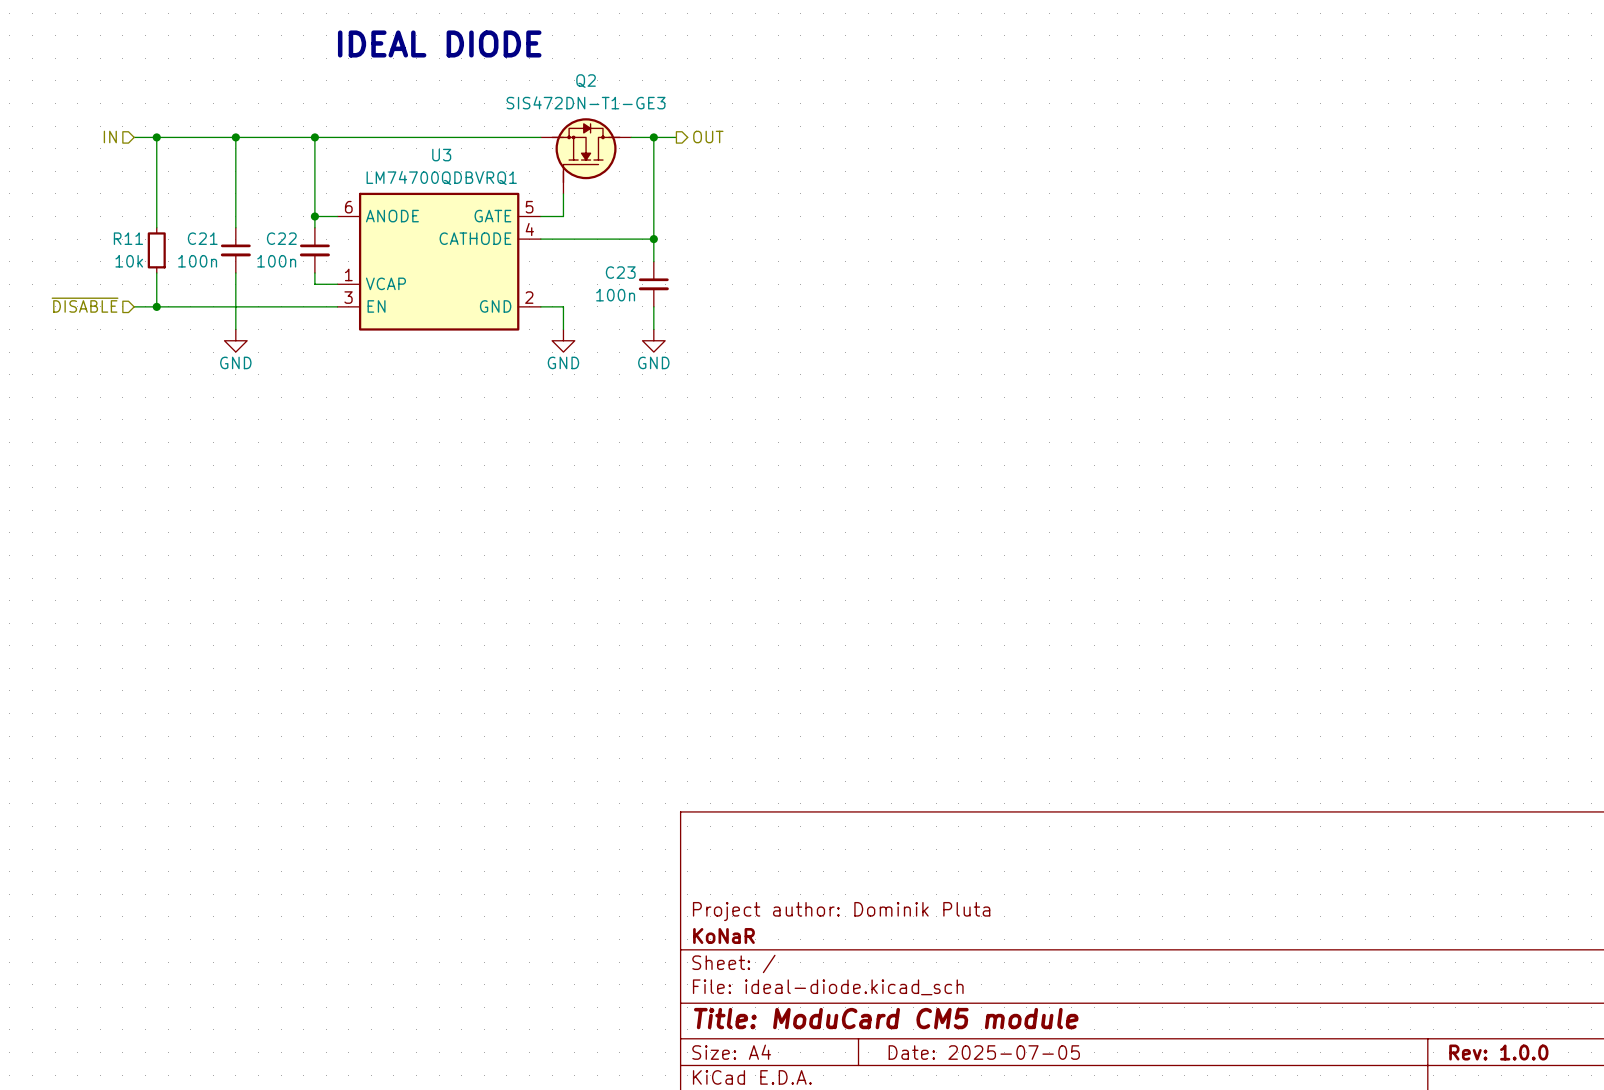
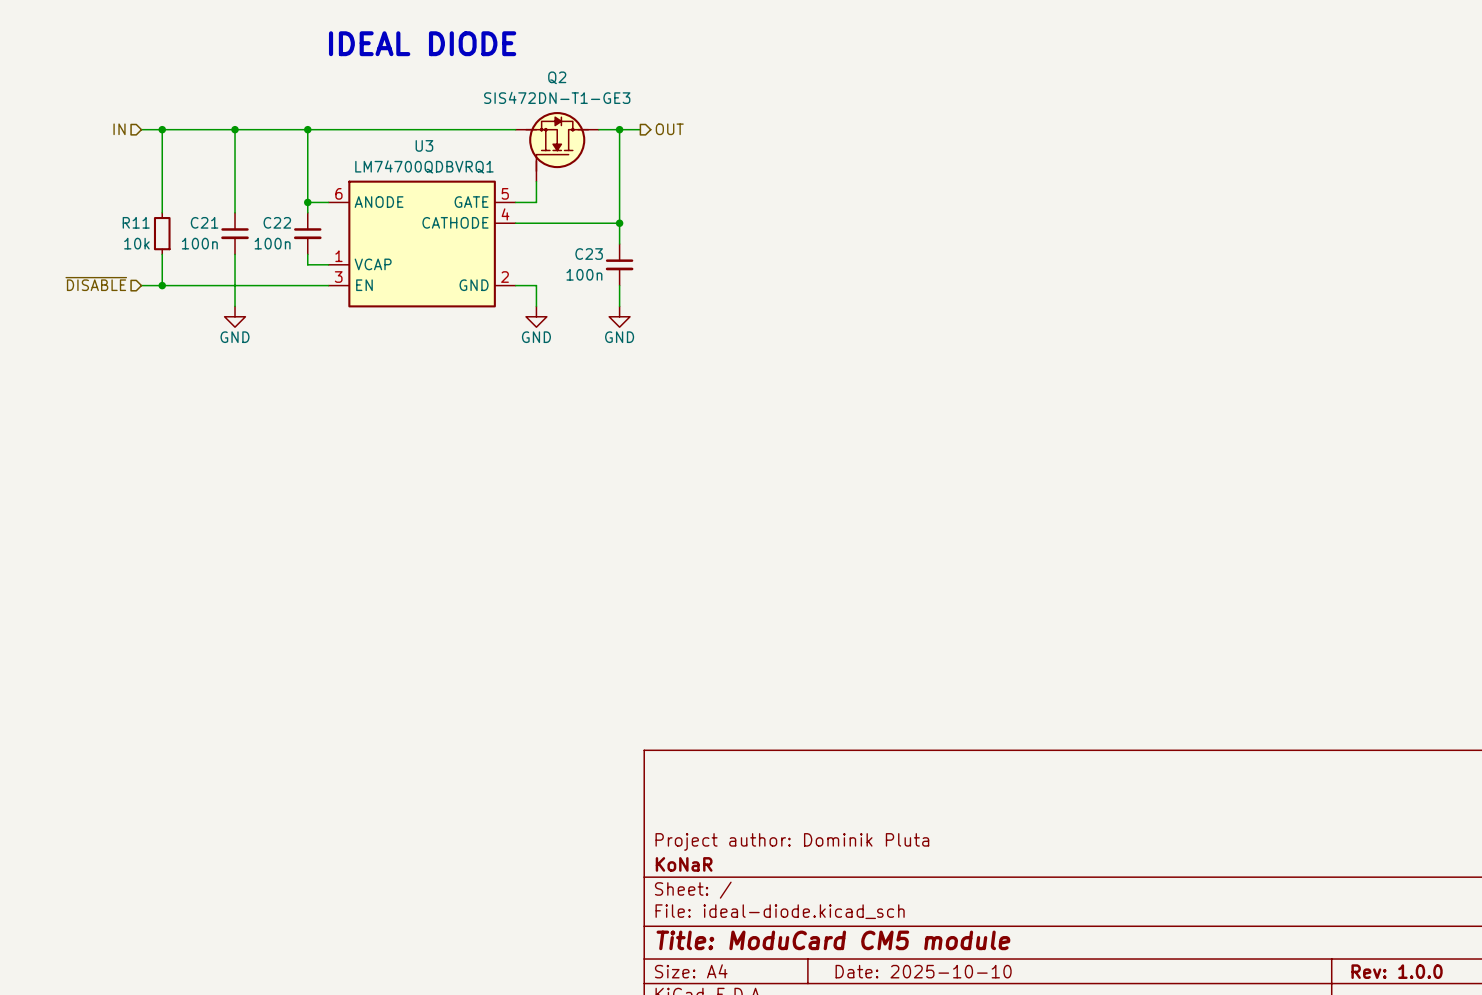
title block: Date: 2025-07-05 (984, 1052) -> Date: 2025-10-10 (923, 971)

